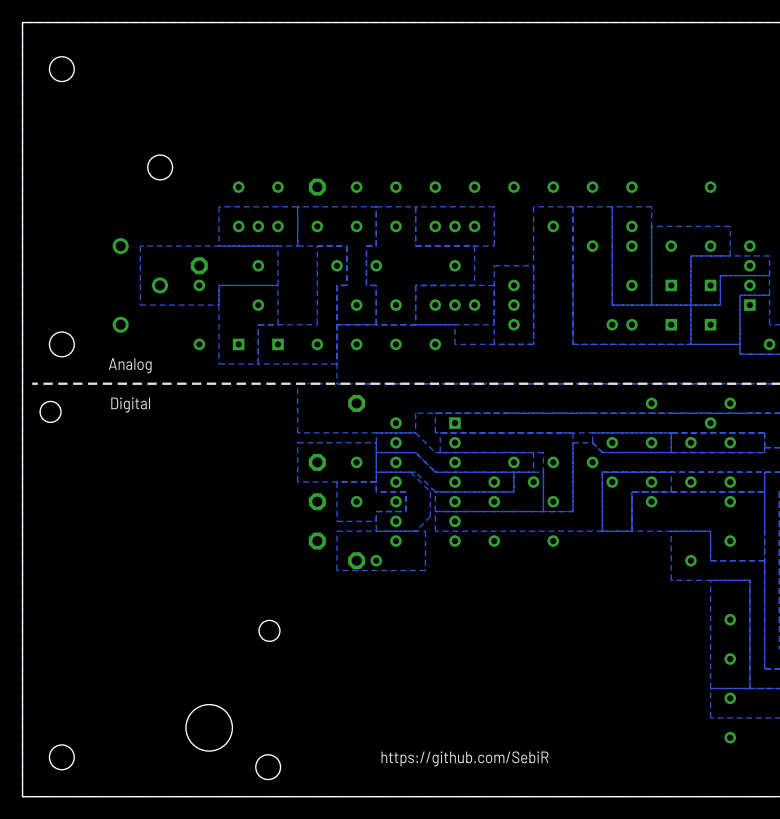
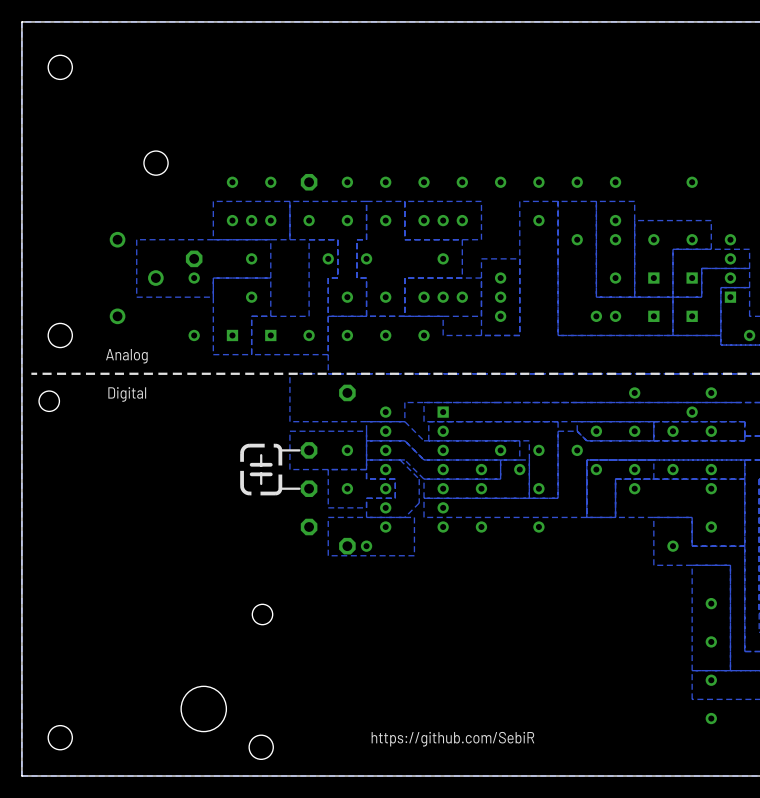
line: none -> (280, 450) (280, 488)
line: none -> (280, 450) (276, 445) (248, 445) (243, 448) (242, 453) (242, 485) (244, 491) (248, 493) (276, 493) (280, 488)
line: none -> (299, 450) (280, 450)
line: none -> (261, 455) (261, 464)
line: none -> (270, 464) (251, 464)
line: none -> (261, 474) (261, 483)
line: none -> (270, 474) (251, 474)
line: none -> (299, 488) (280, 488)

